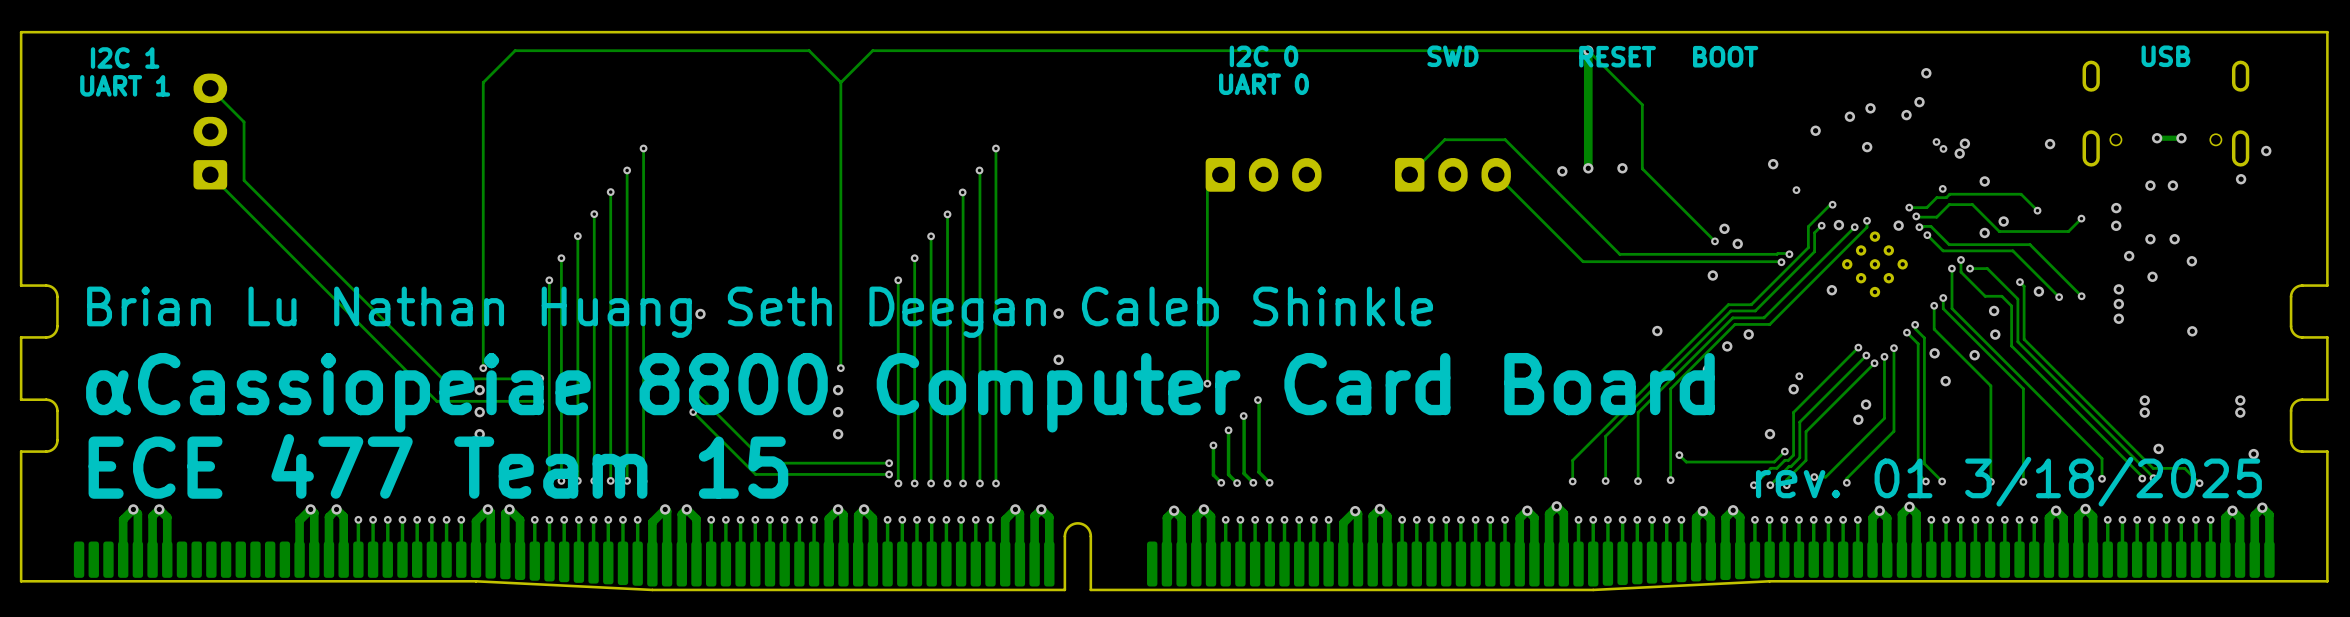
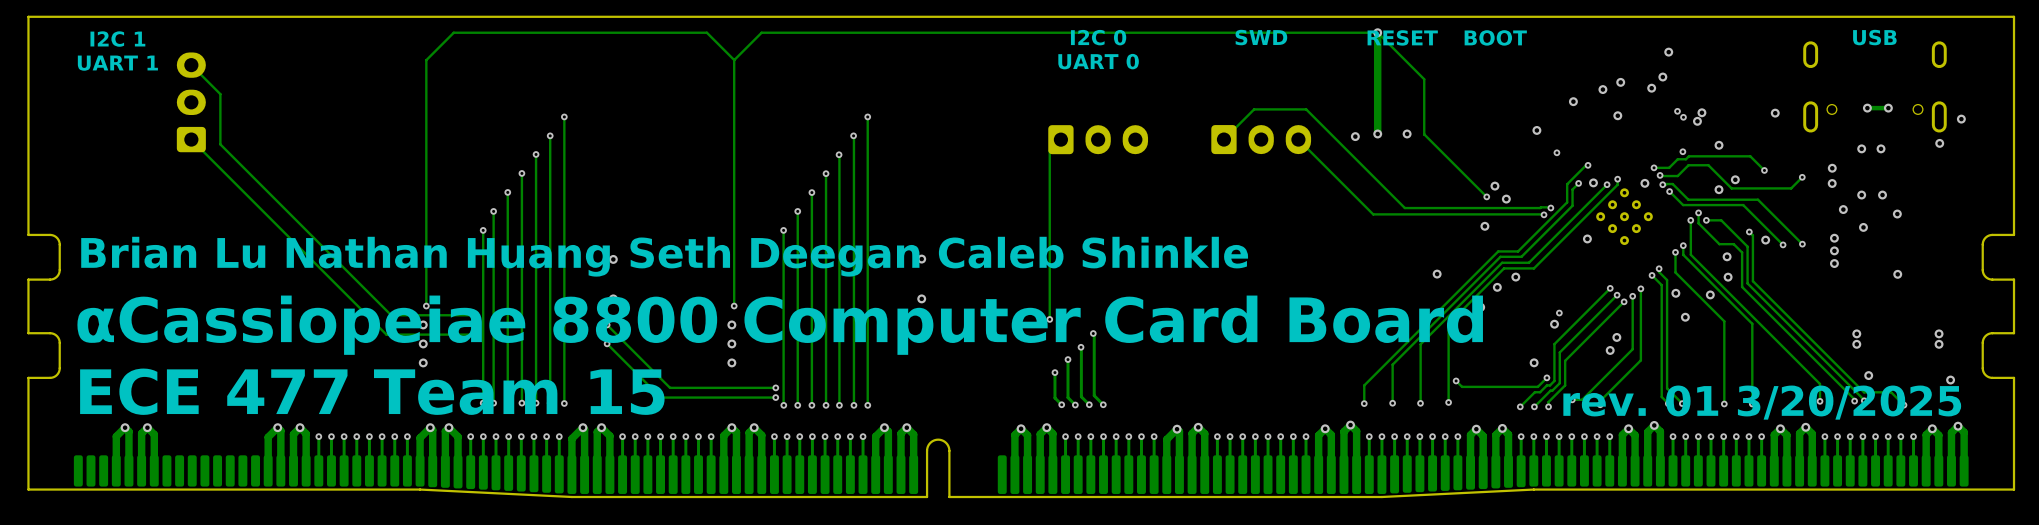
text: rev. 01 3/18/2025 (2008, 481) -> rev. 01 3/20/2025 (1762, 402)

